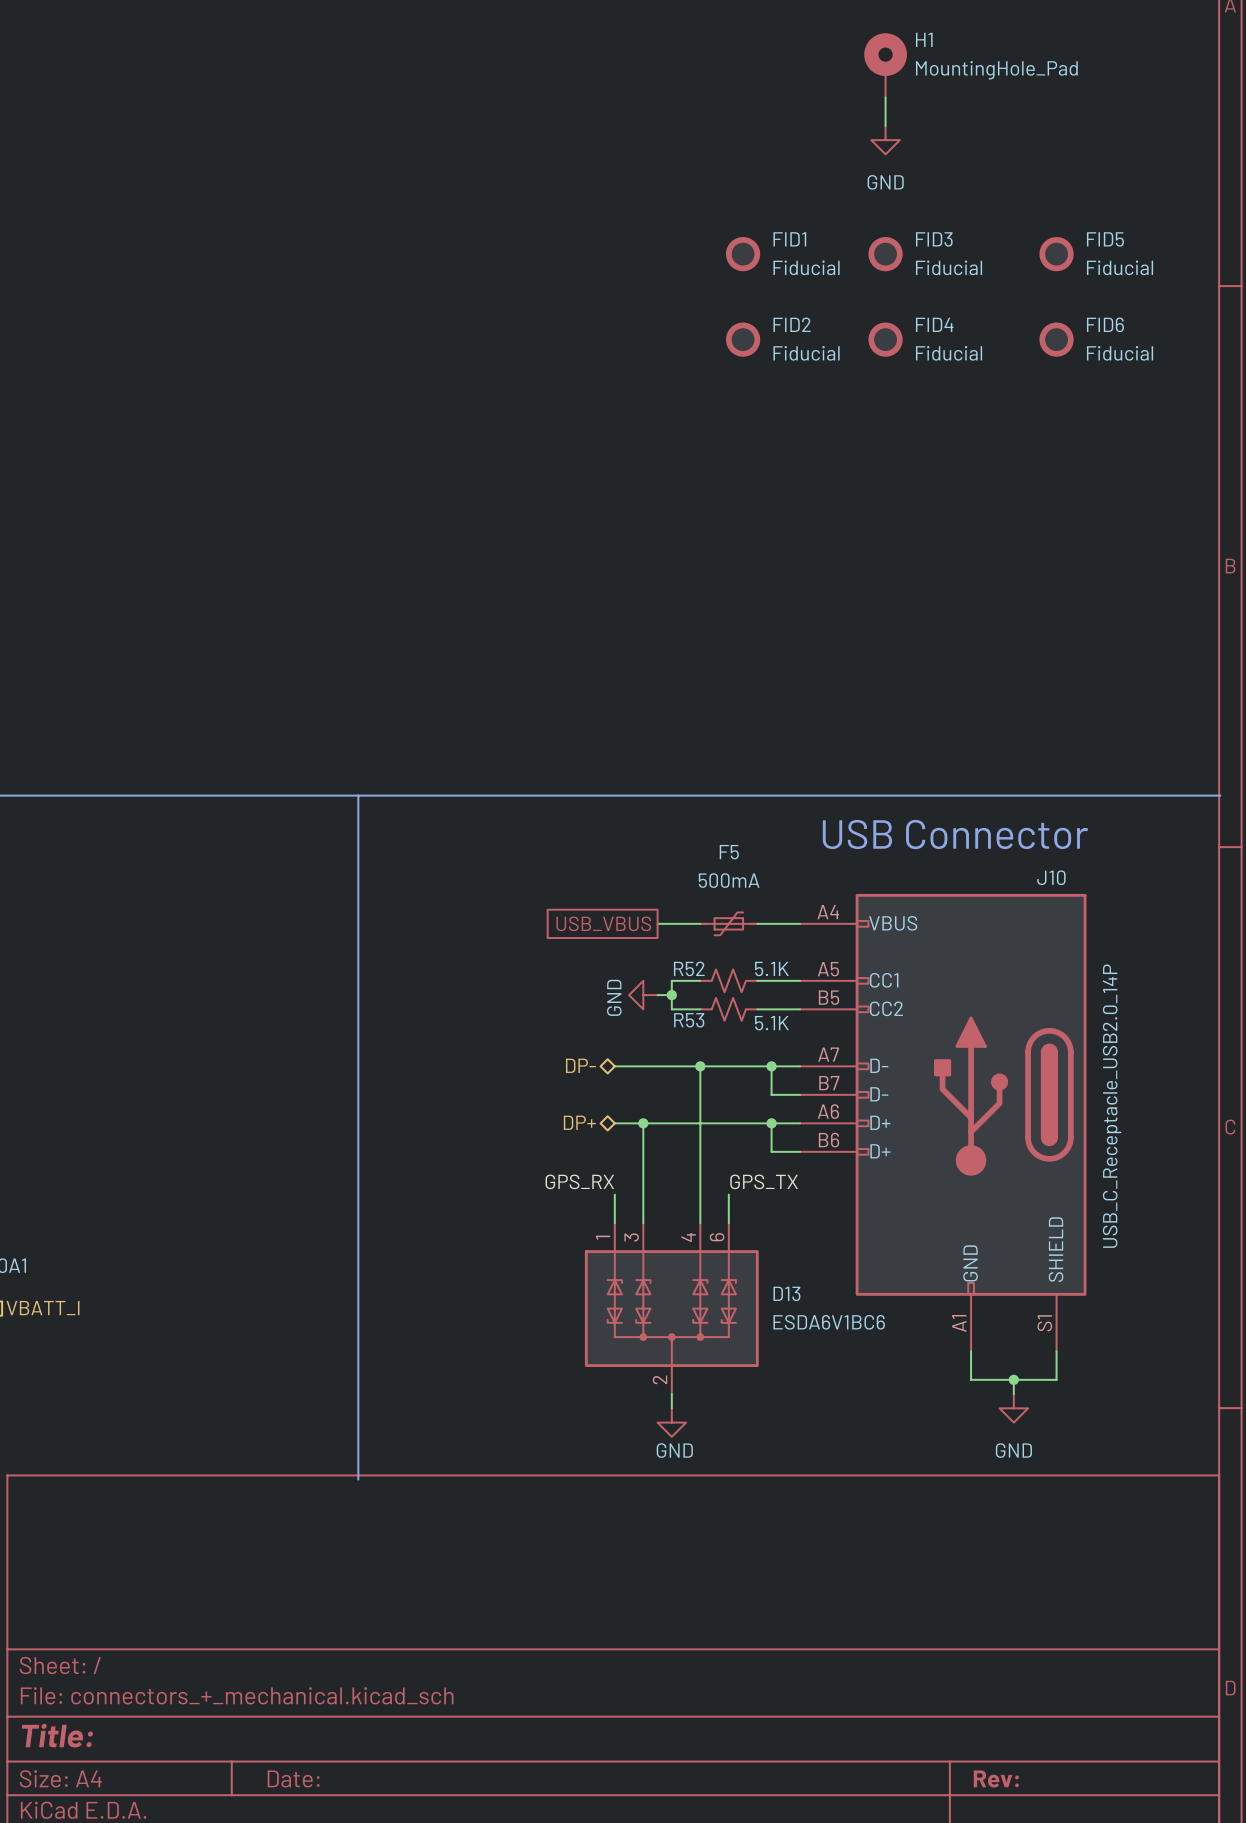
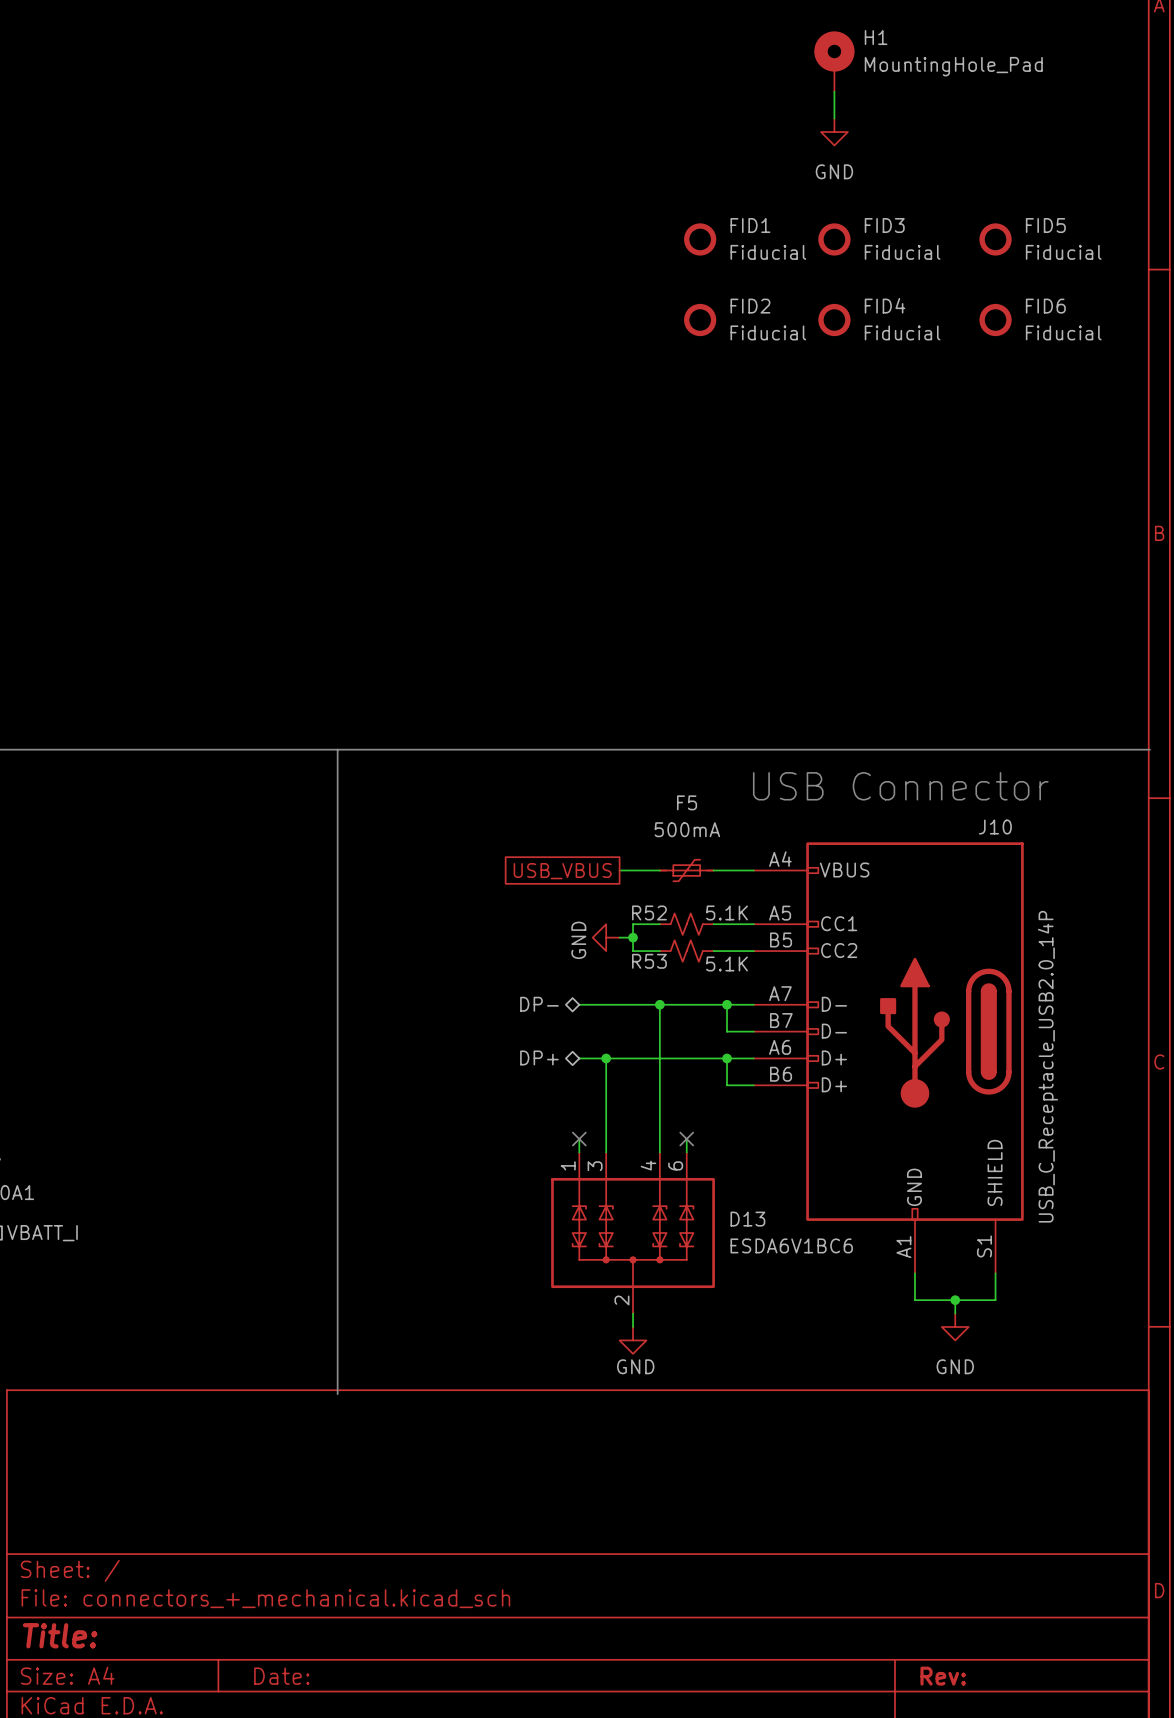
label: GPS_RX (579, 1181) -> none
label: GPS_TX (764, 1181) -> none
wire: (614, 1194) (614, 1208) -> none
wire: (728, 1194) (728, 1208) -> none
no-connect mark: none -> (579, 1139)
no-connect mark: none -> (686, 1139)

